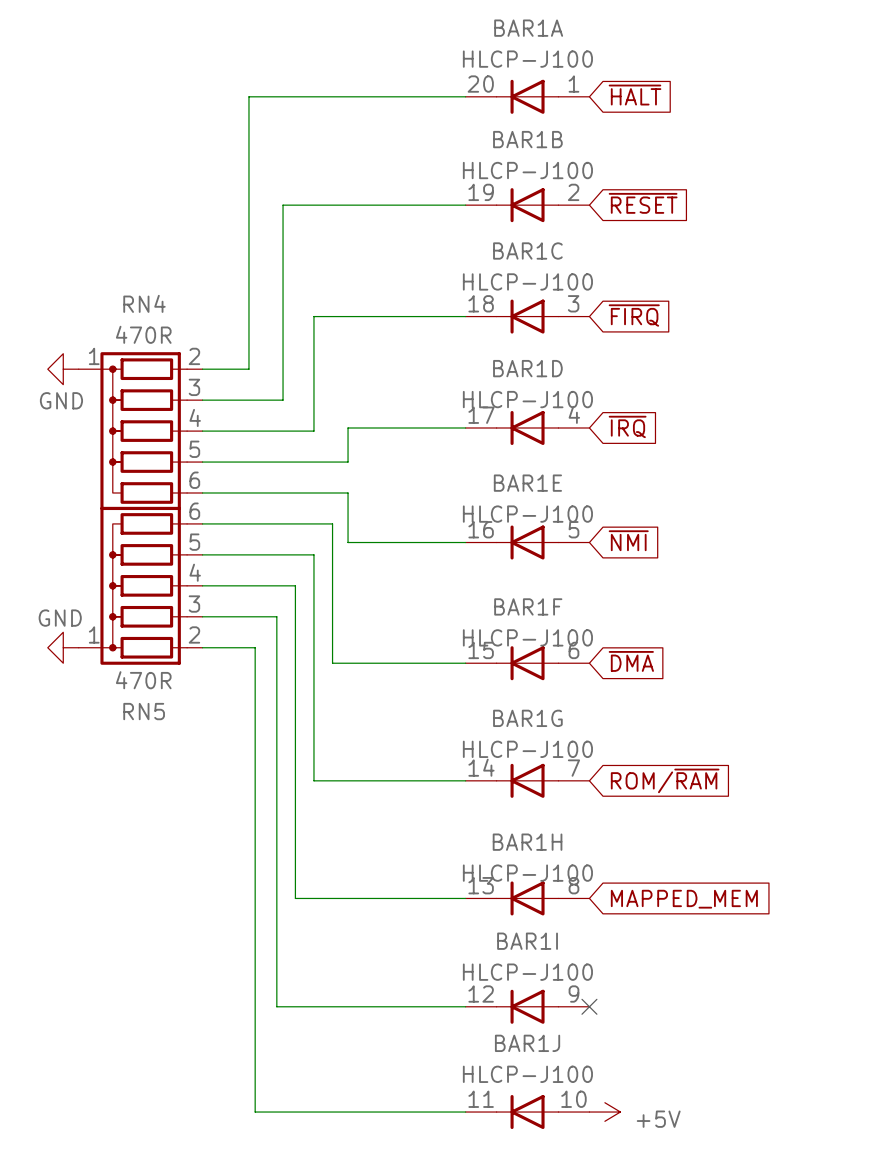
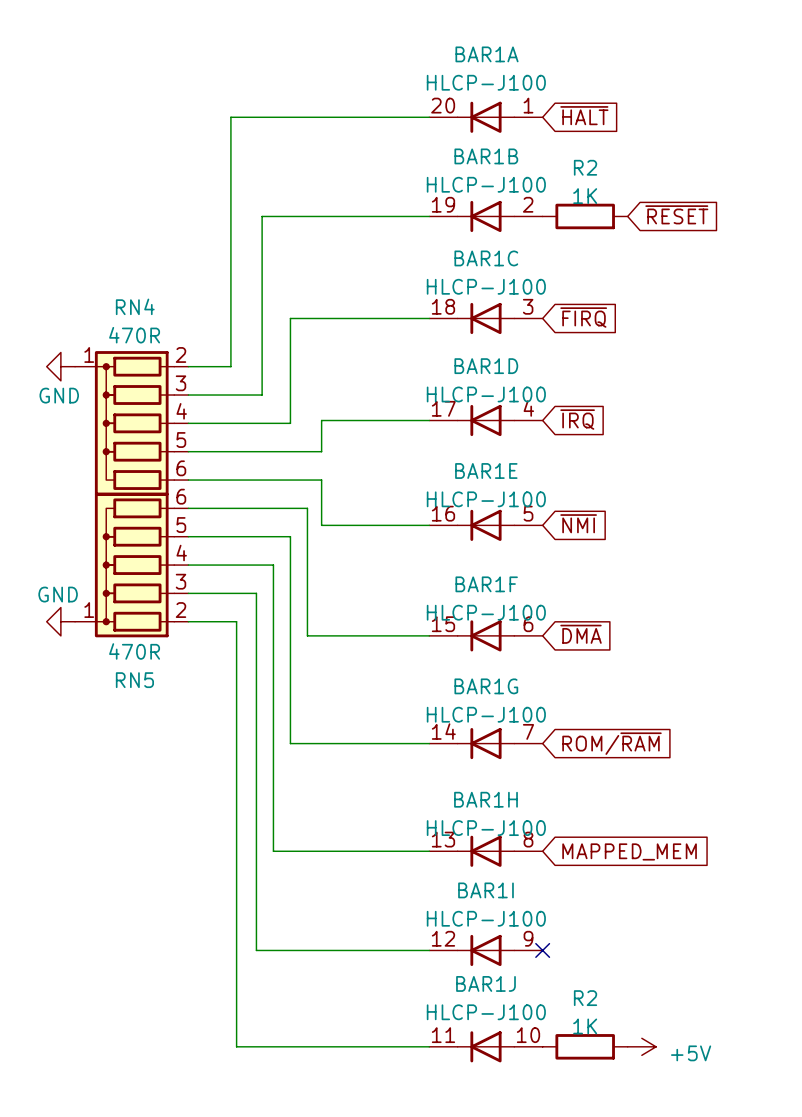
global label position: ~{RESET} (643, 203) -> ~{RESET} (676, 214)
R2: none -> 1K (585, 216)
power symbol position: +5V (604, 1112) -> +5V (641, 1046)
R2: none -> 1K (585, 1046)

